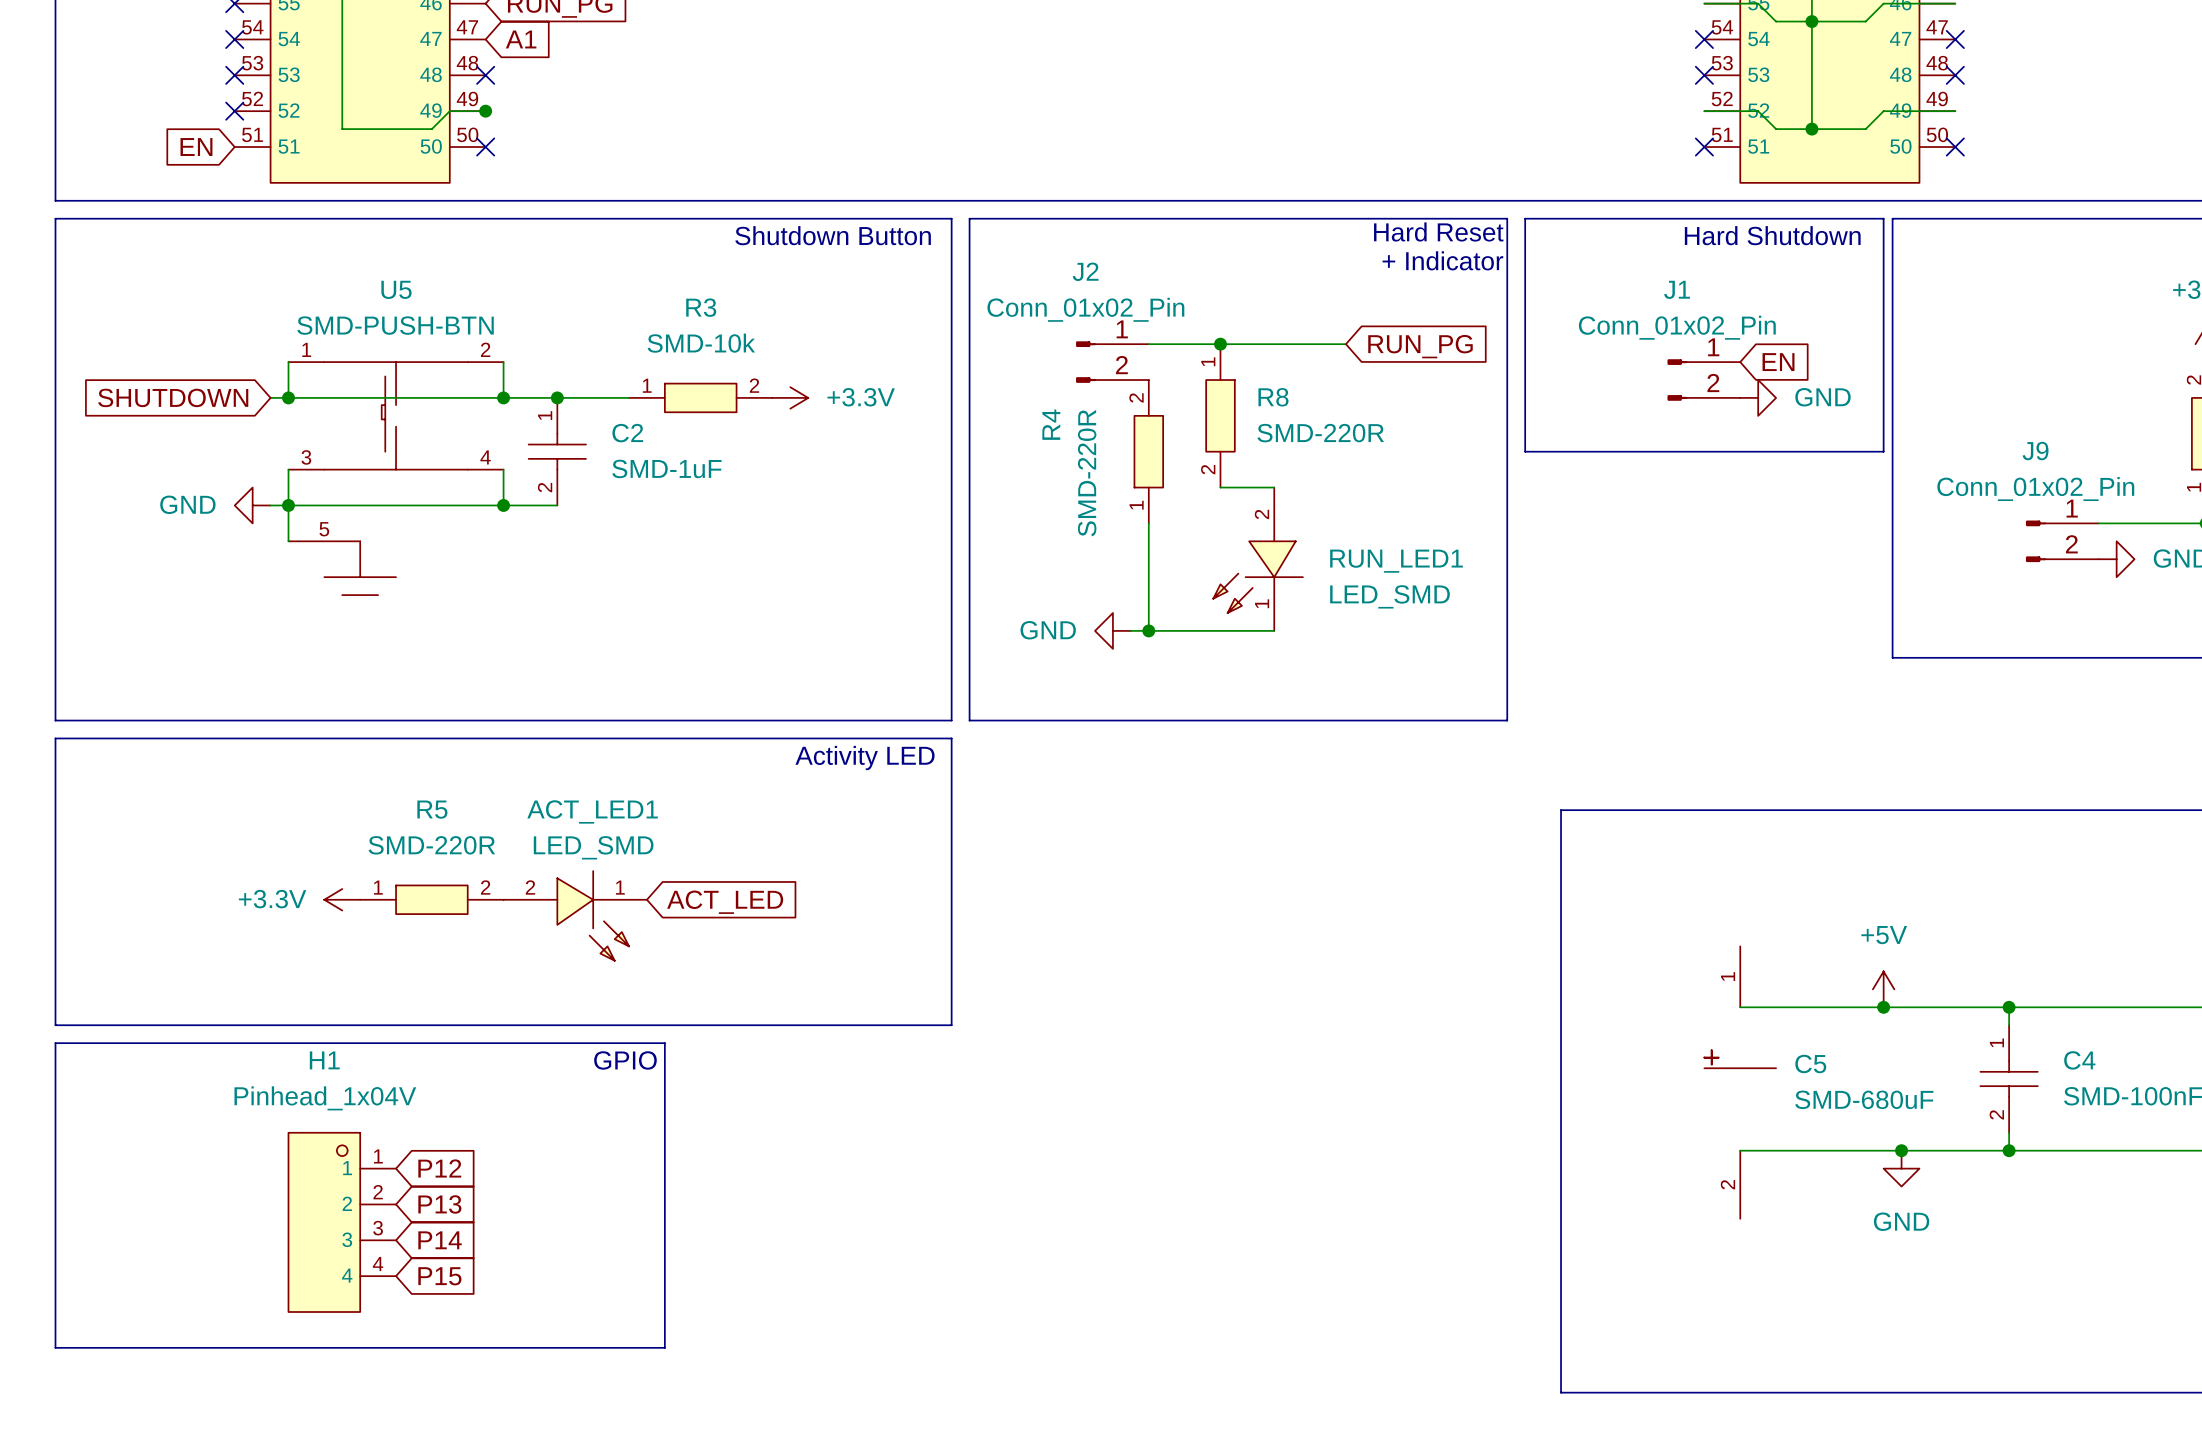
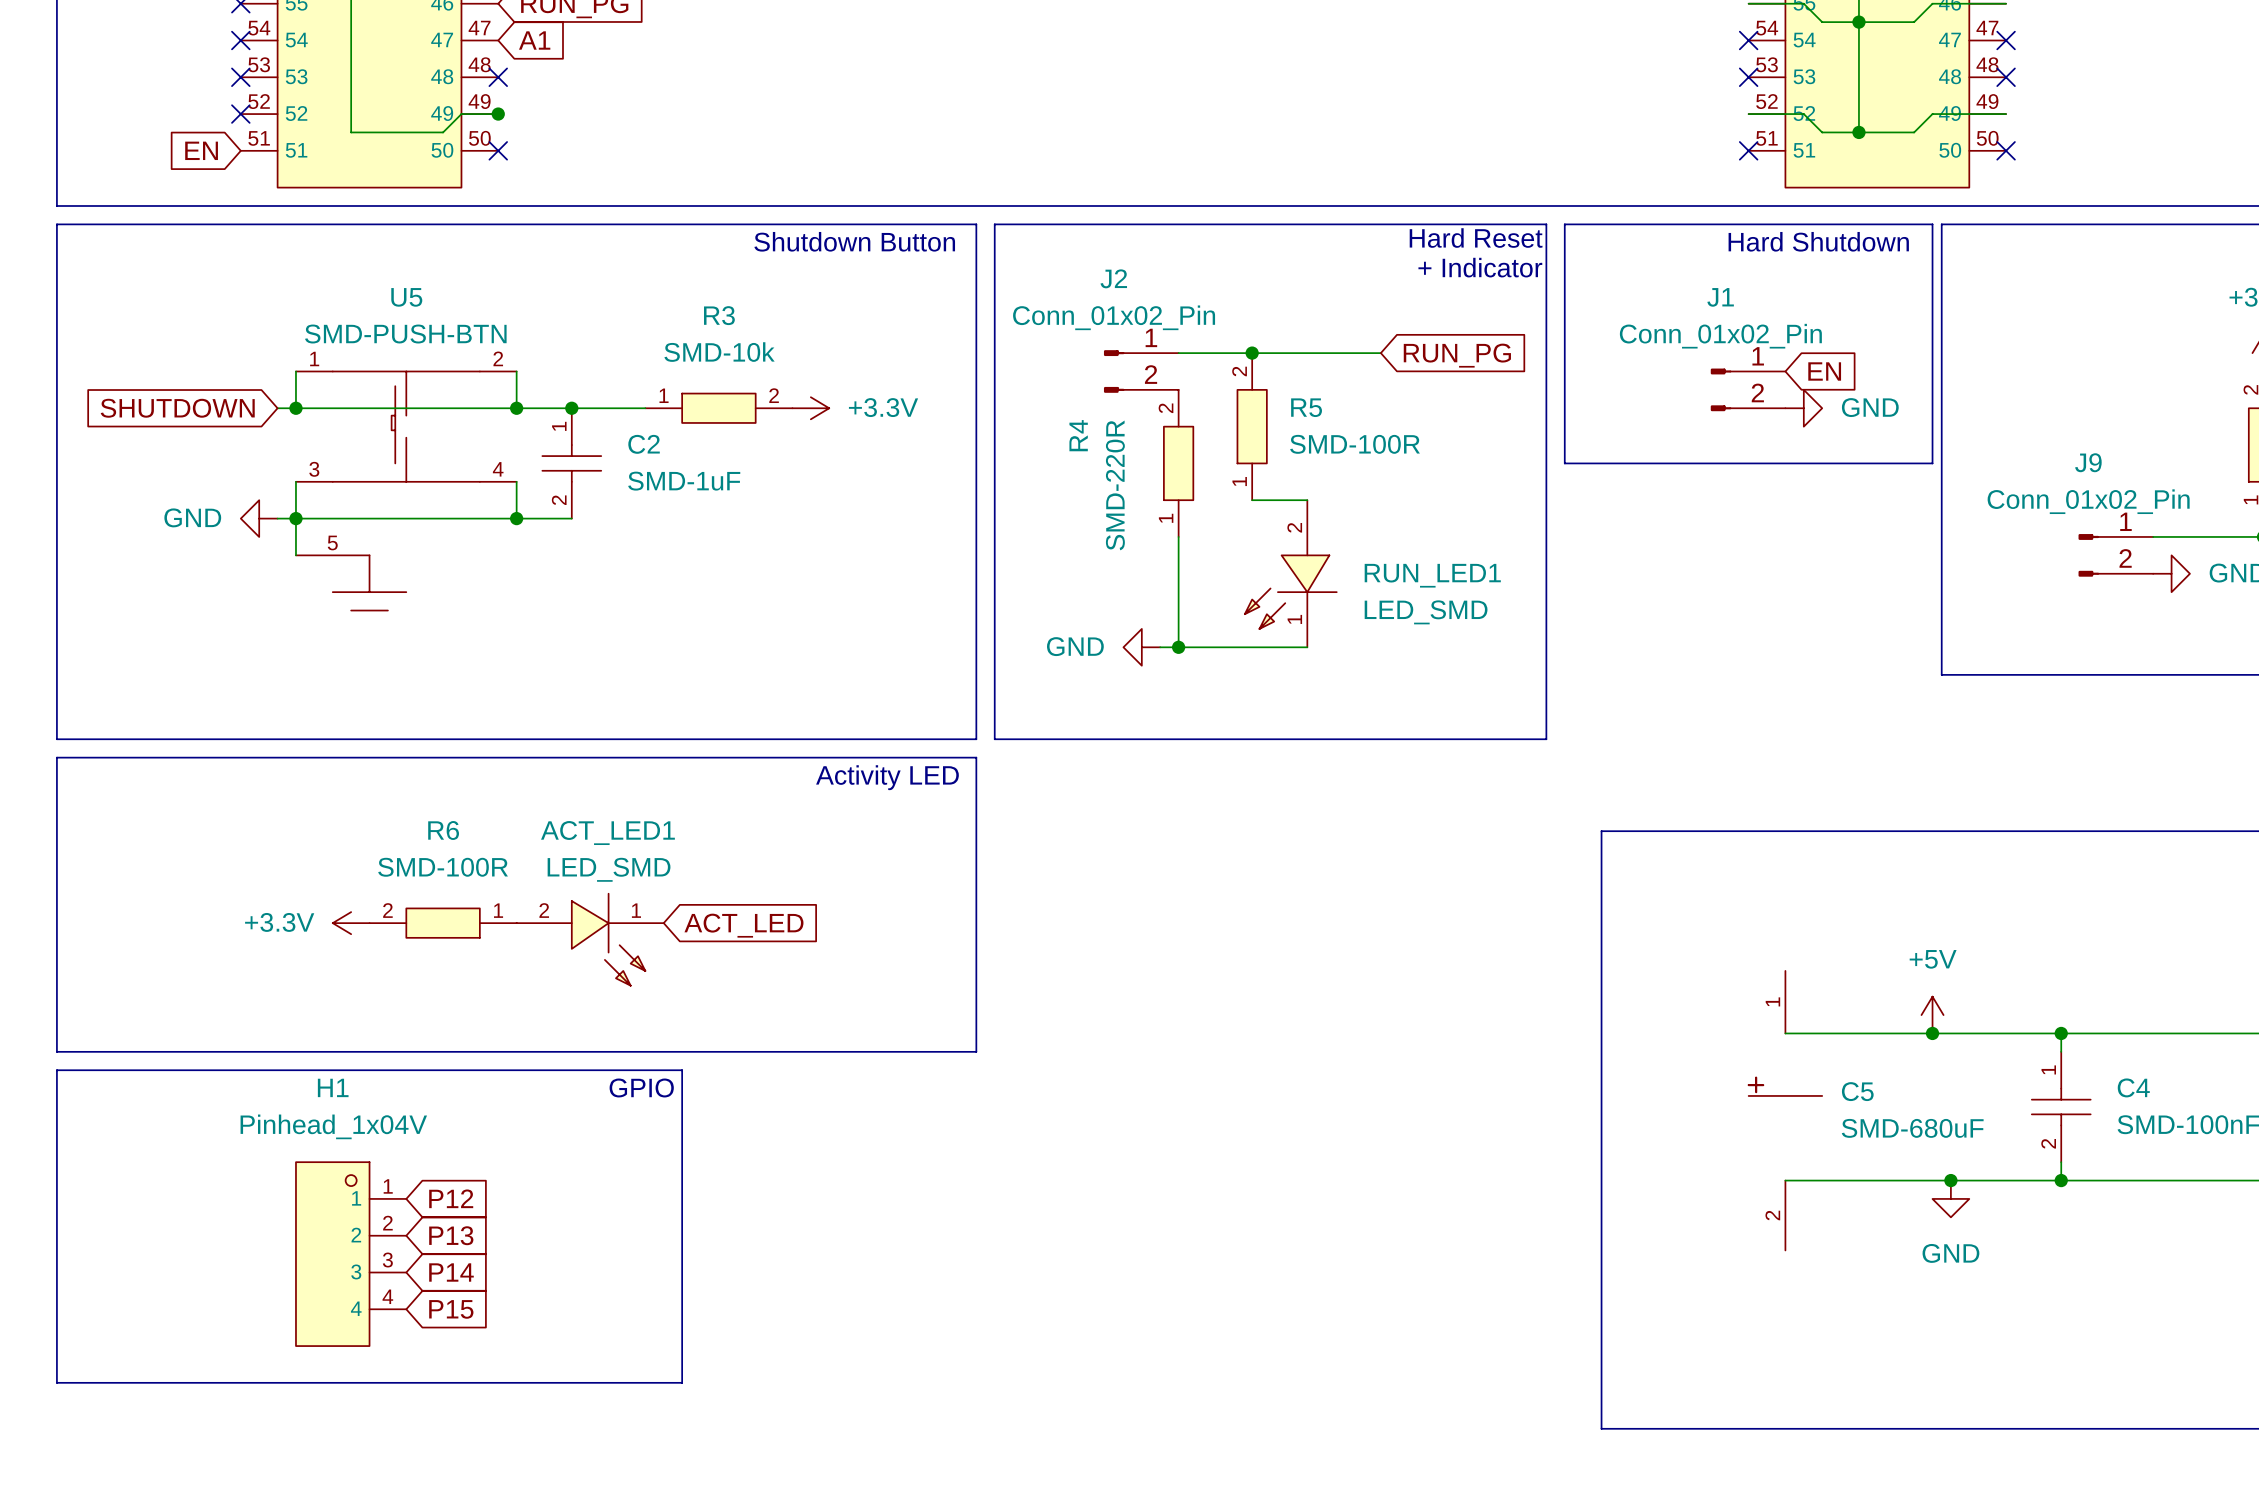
R8: SMD-220R (1220, 415) -> none
R5 name position: R5 (432, 809) -> R5 (1306, 407)
R5 value: SMD-220R (431, 845) -> SMD-100R (1355, 444)
R5 rotation: 0° (431, 899) -> 90° counterclockwise (1252, 426)
R5 position: (431, 899) -> (1252, 426)
R6: none -> SMD-100R (443, 923)

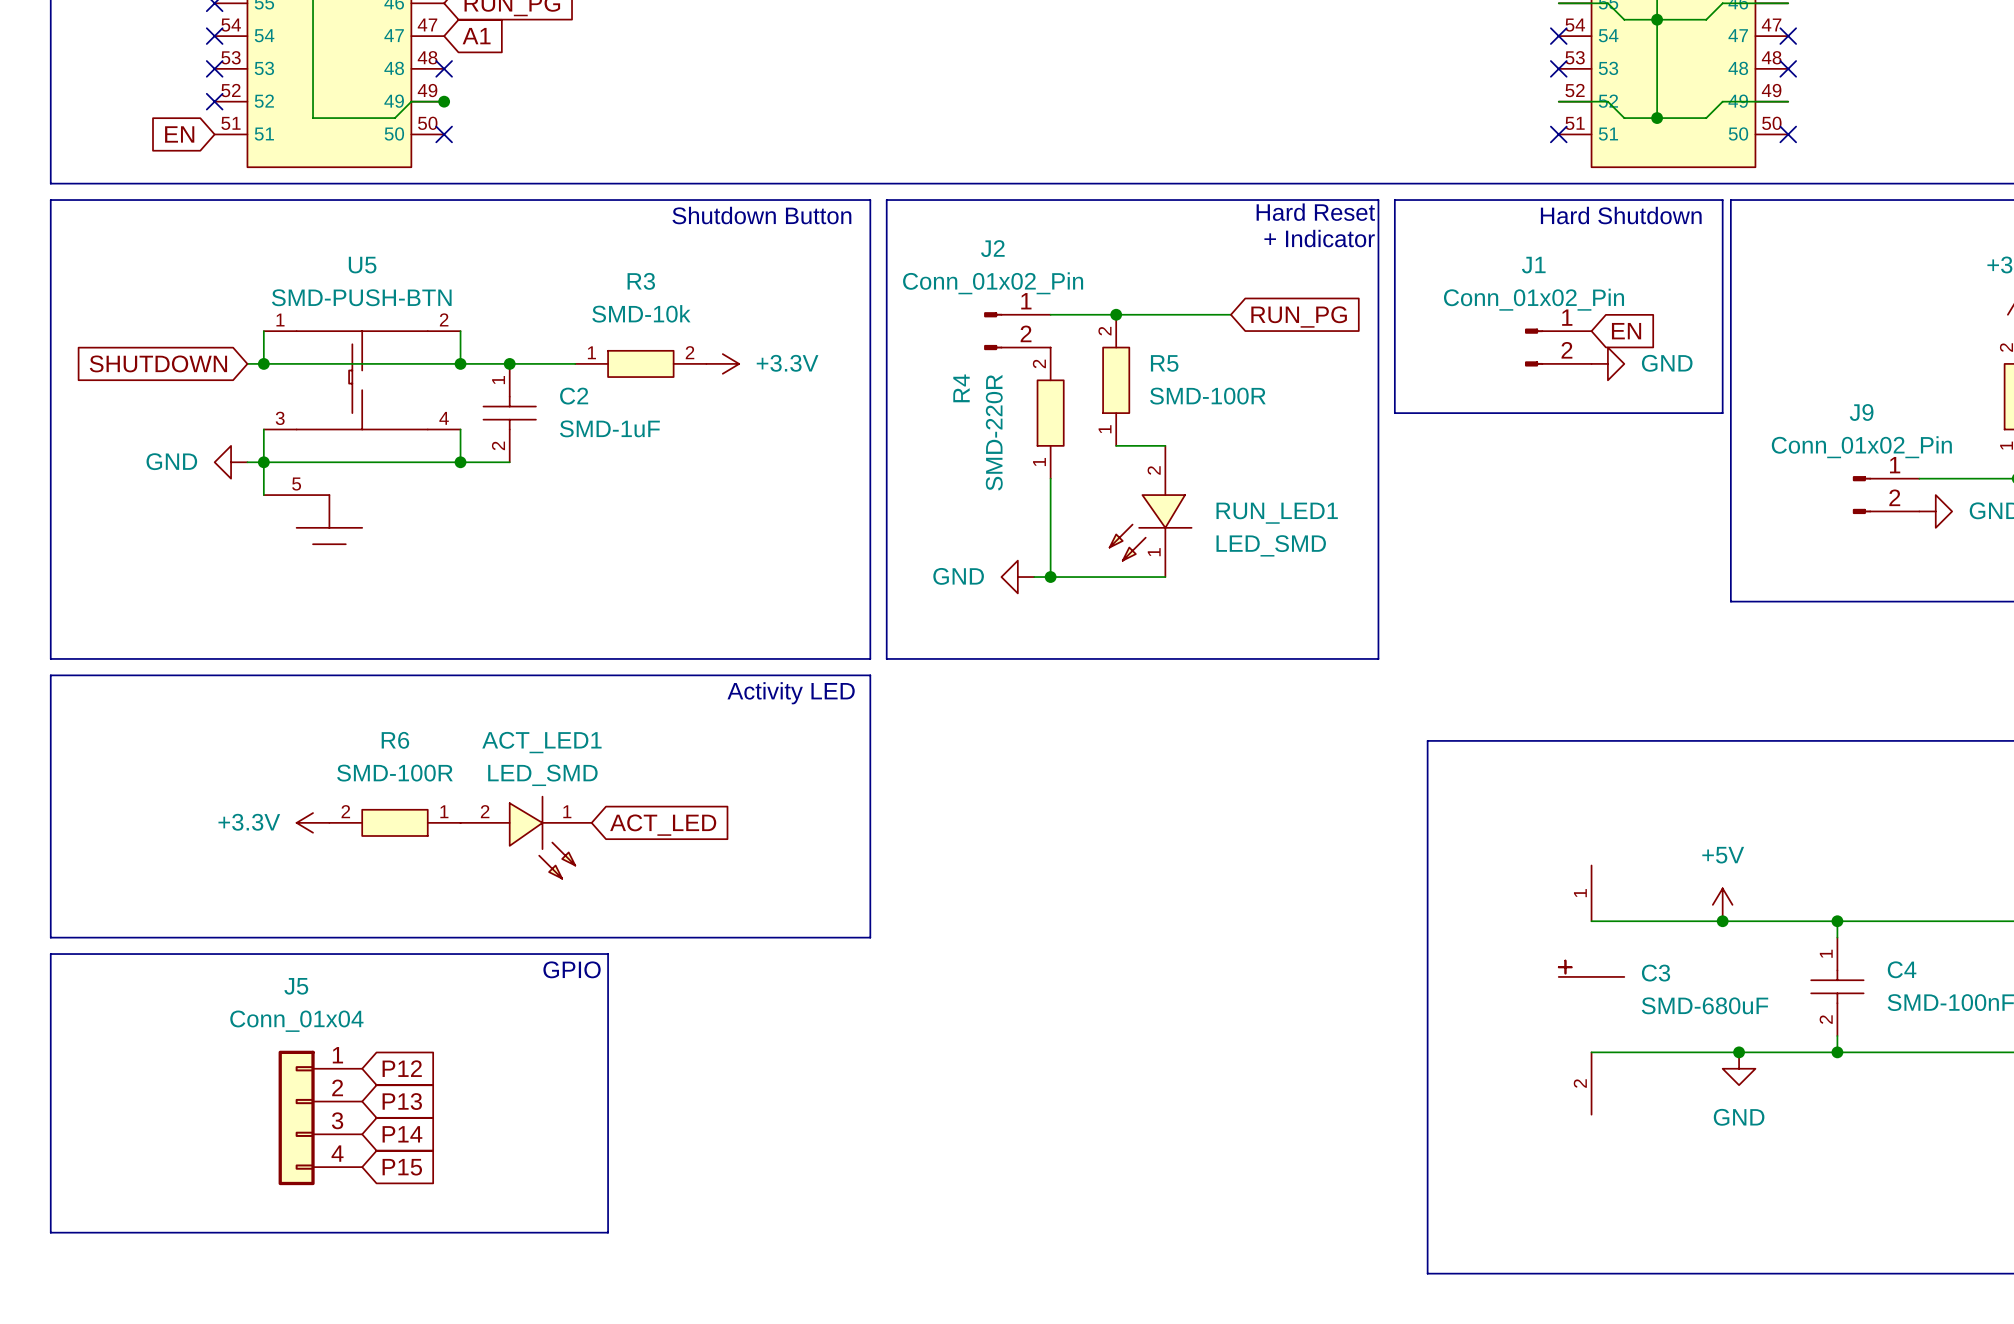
C5 name: C5 (1857, 1091) -> C3 (1656, 973)
H1: Pinhead_1x04V (351, 1254) -> none
J5: none -> Conn_01x04 (320, 1117)

